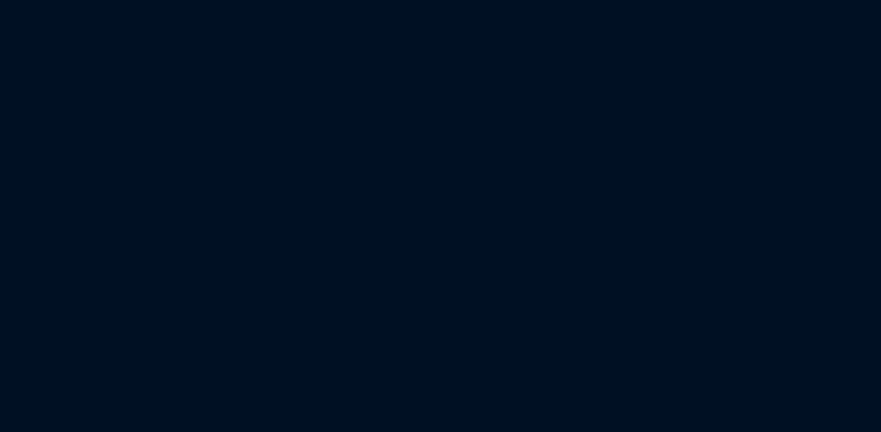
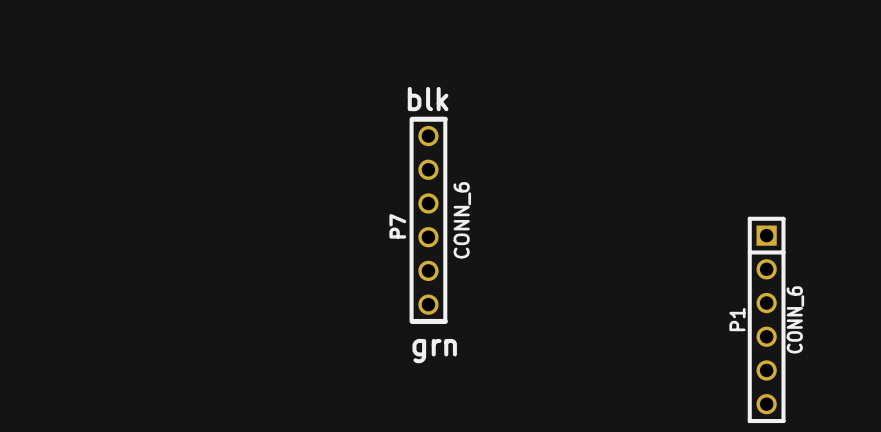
P7: none -> CONN_6 (428, 220)
P1: none -> CONN_6 (766, 319)

